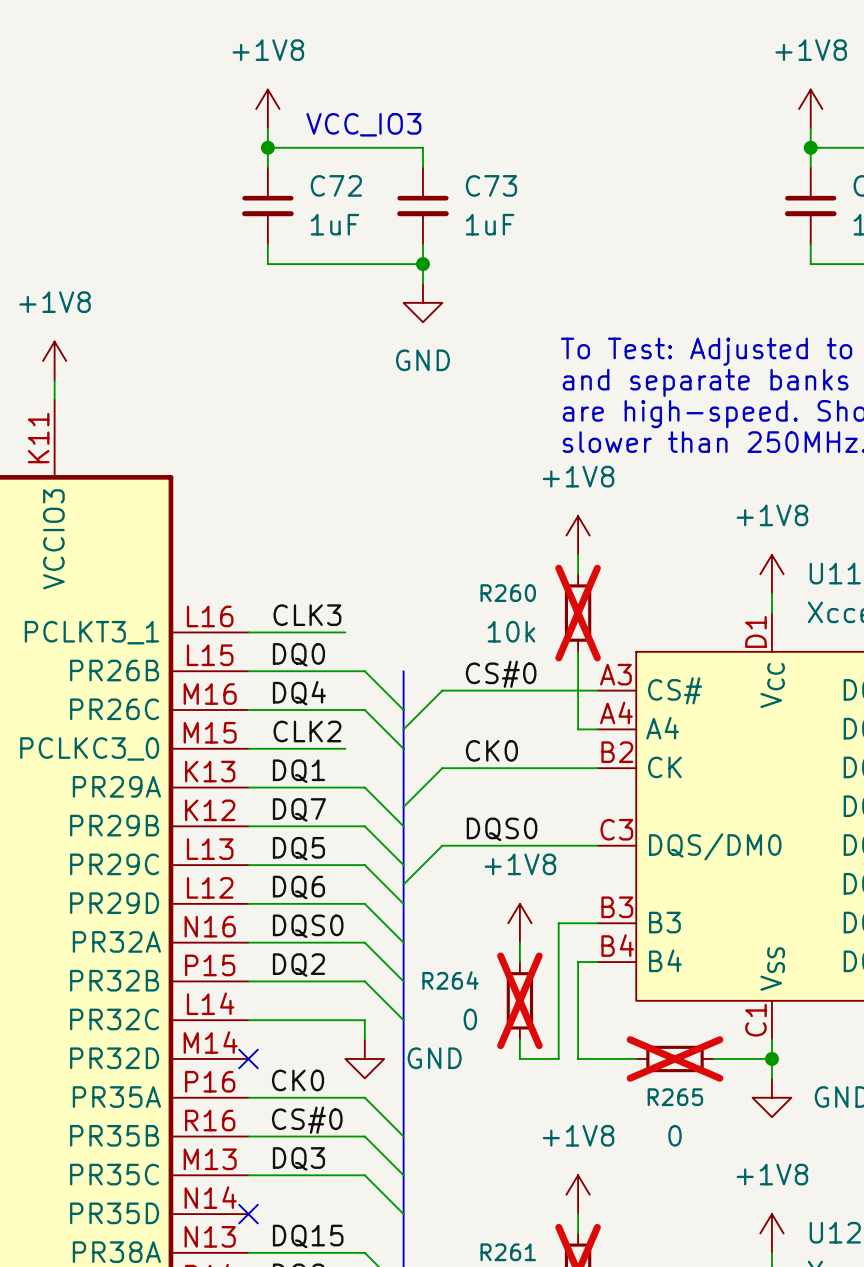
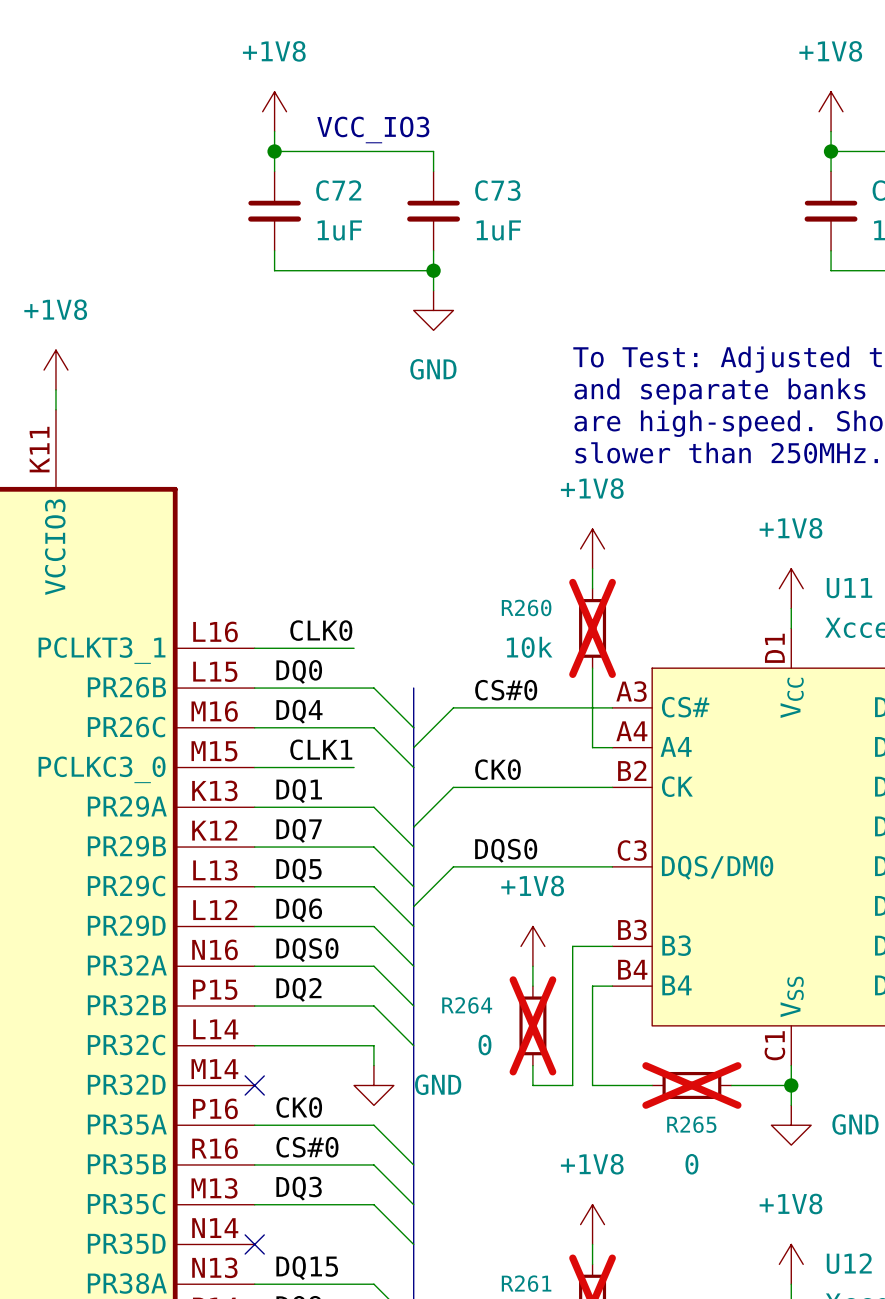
label: CLK3 (307, 615) -> CLK0 (321, 630)
label: CLK2 (307, 731) -> CLK1 (321, 749)

